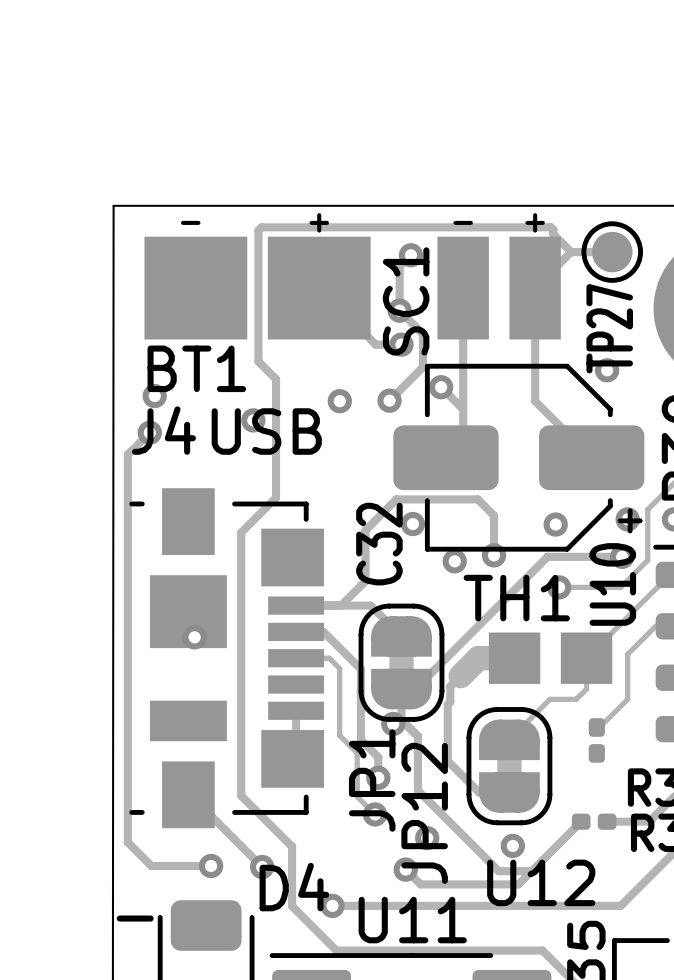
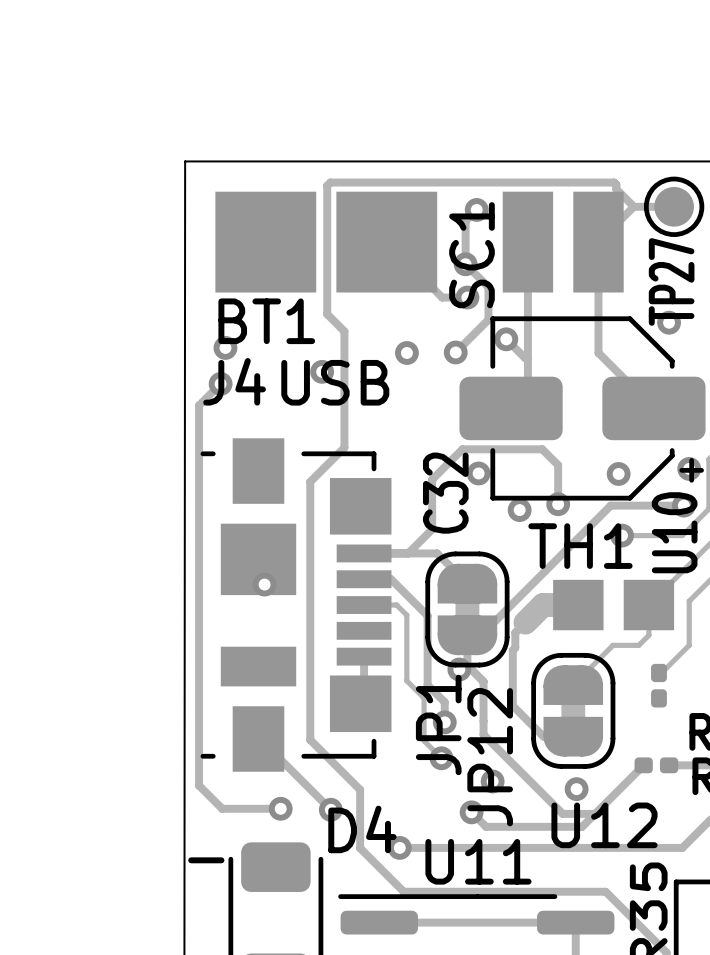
text: - (190, 222) -> none
text: + (319, 222) -> none
text: - (463, 222) -> none
text: + (535, 222) -> none

